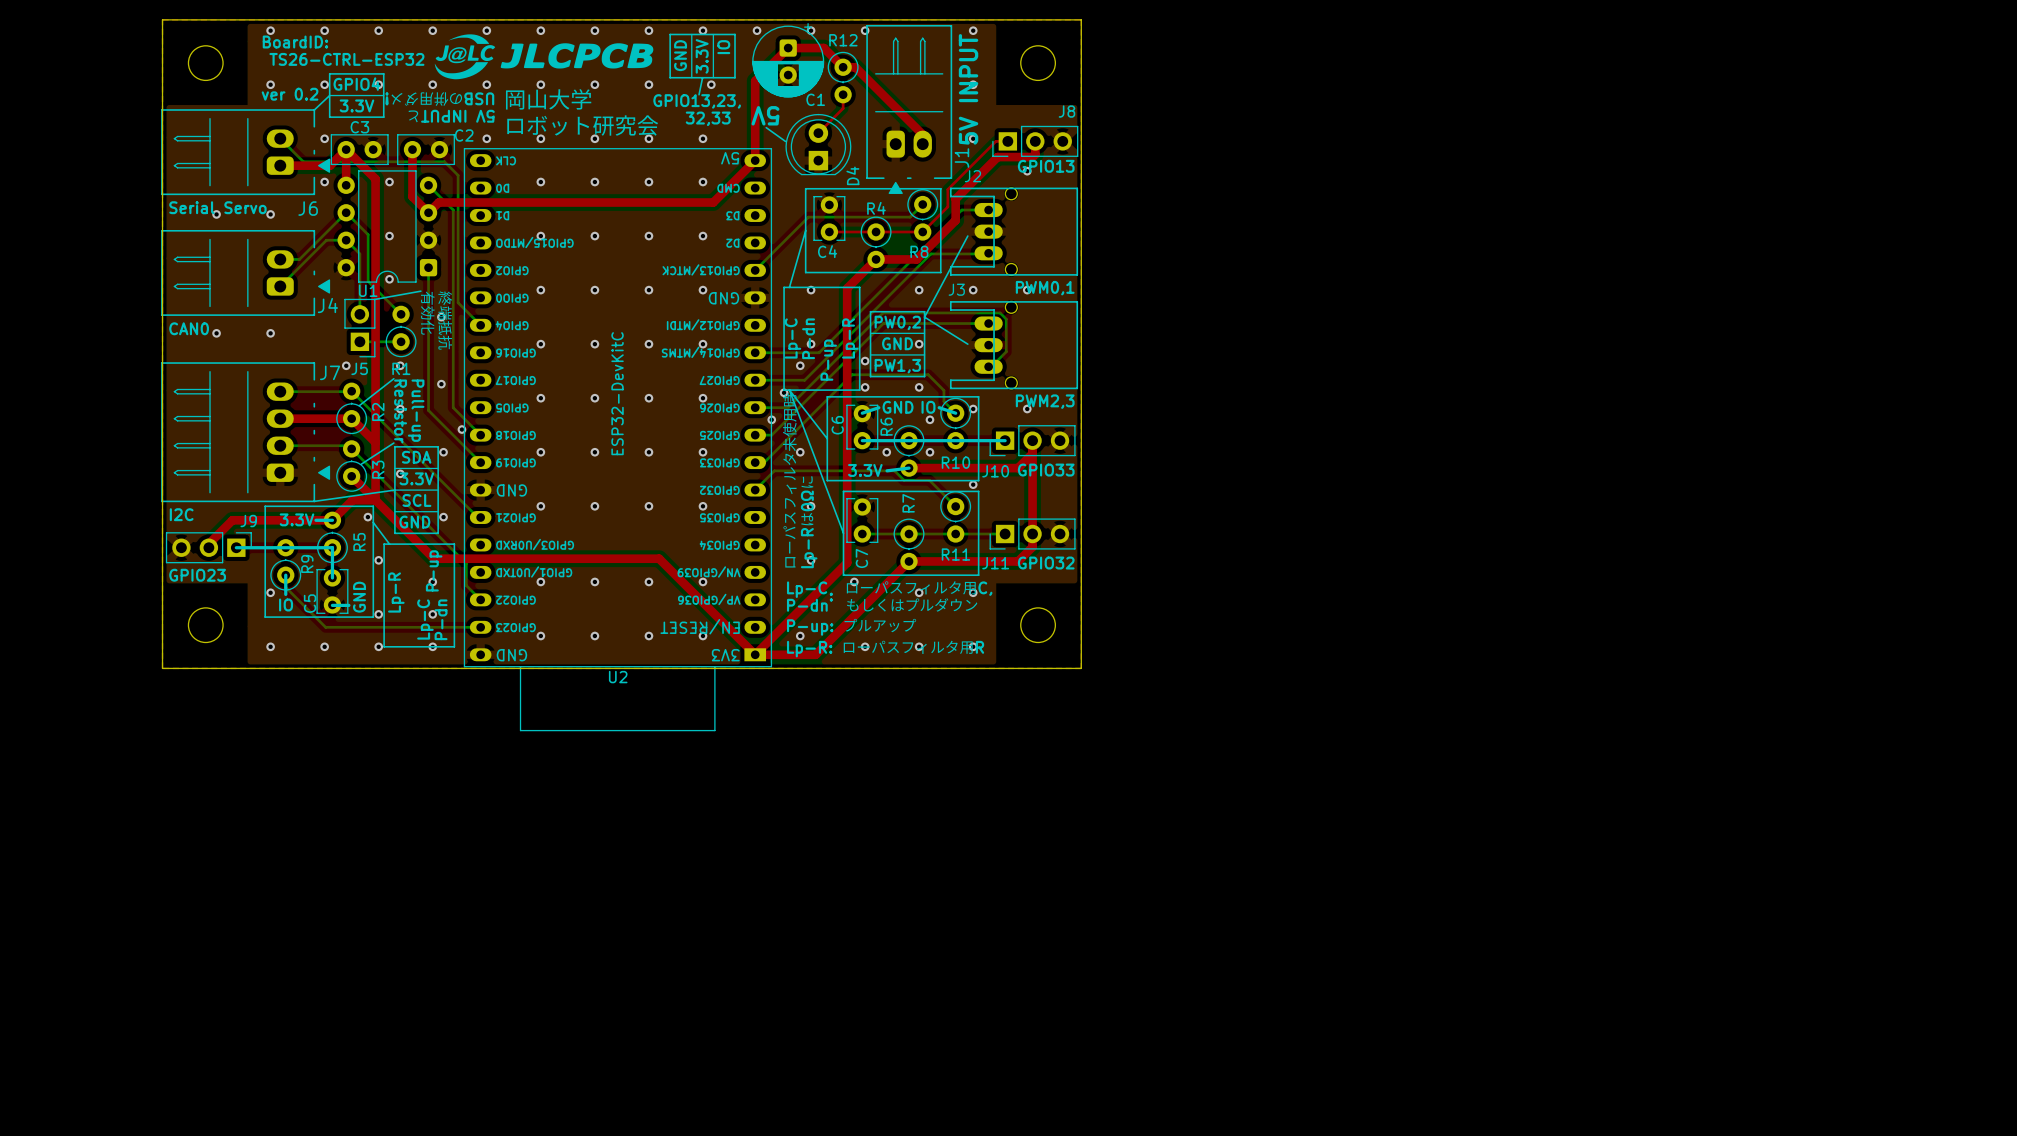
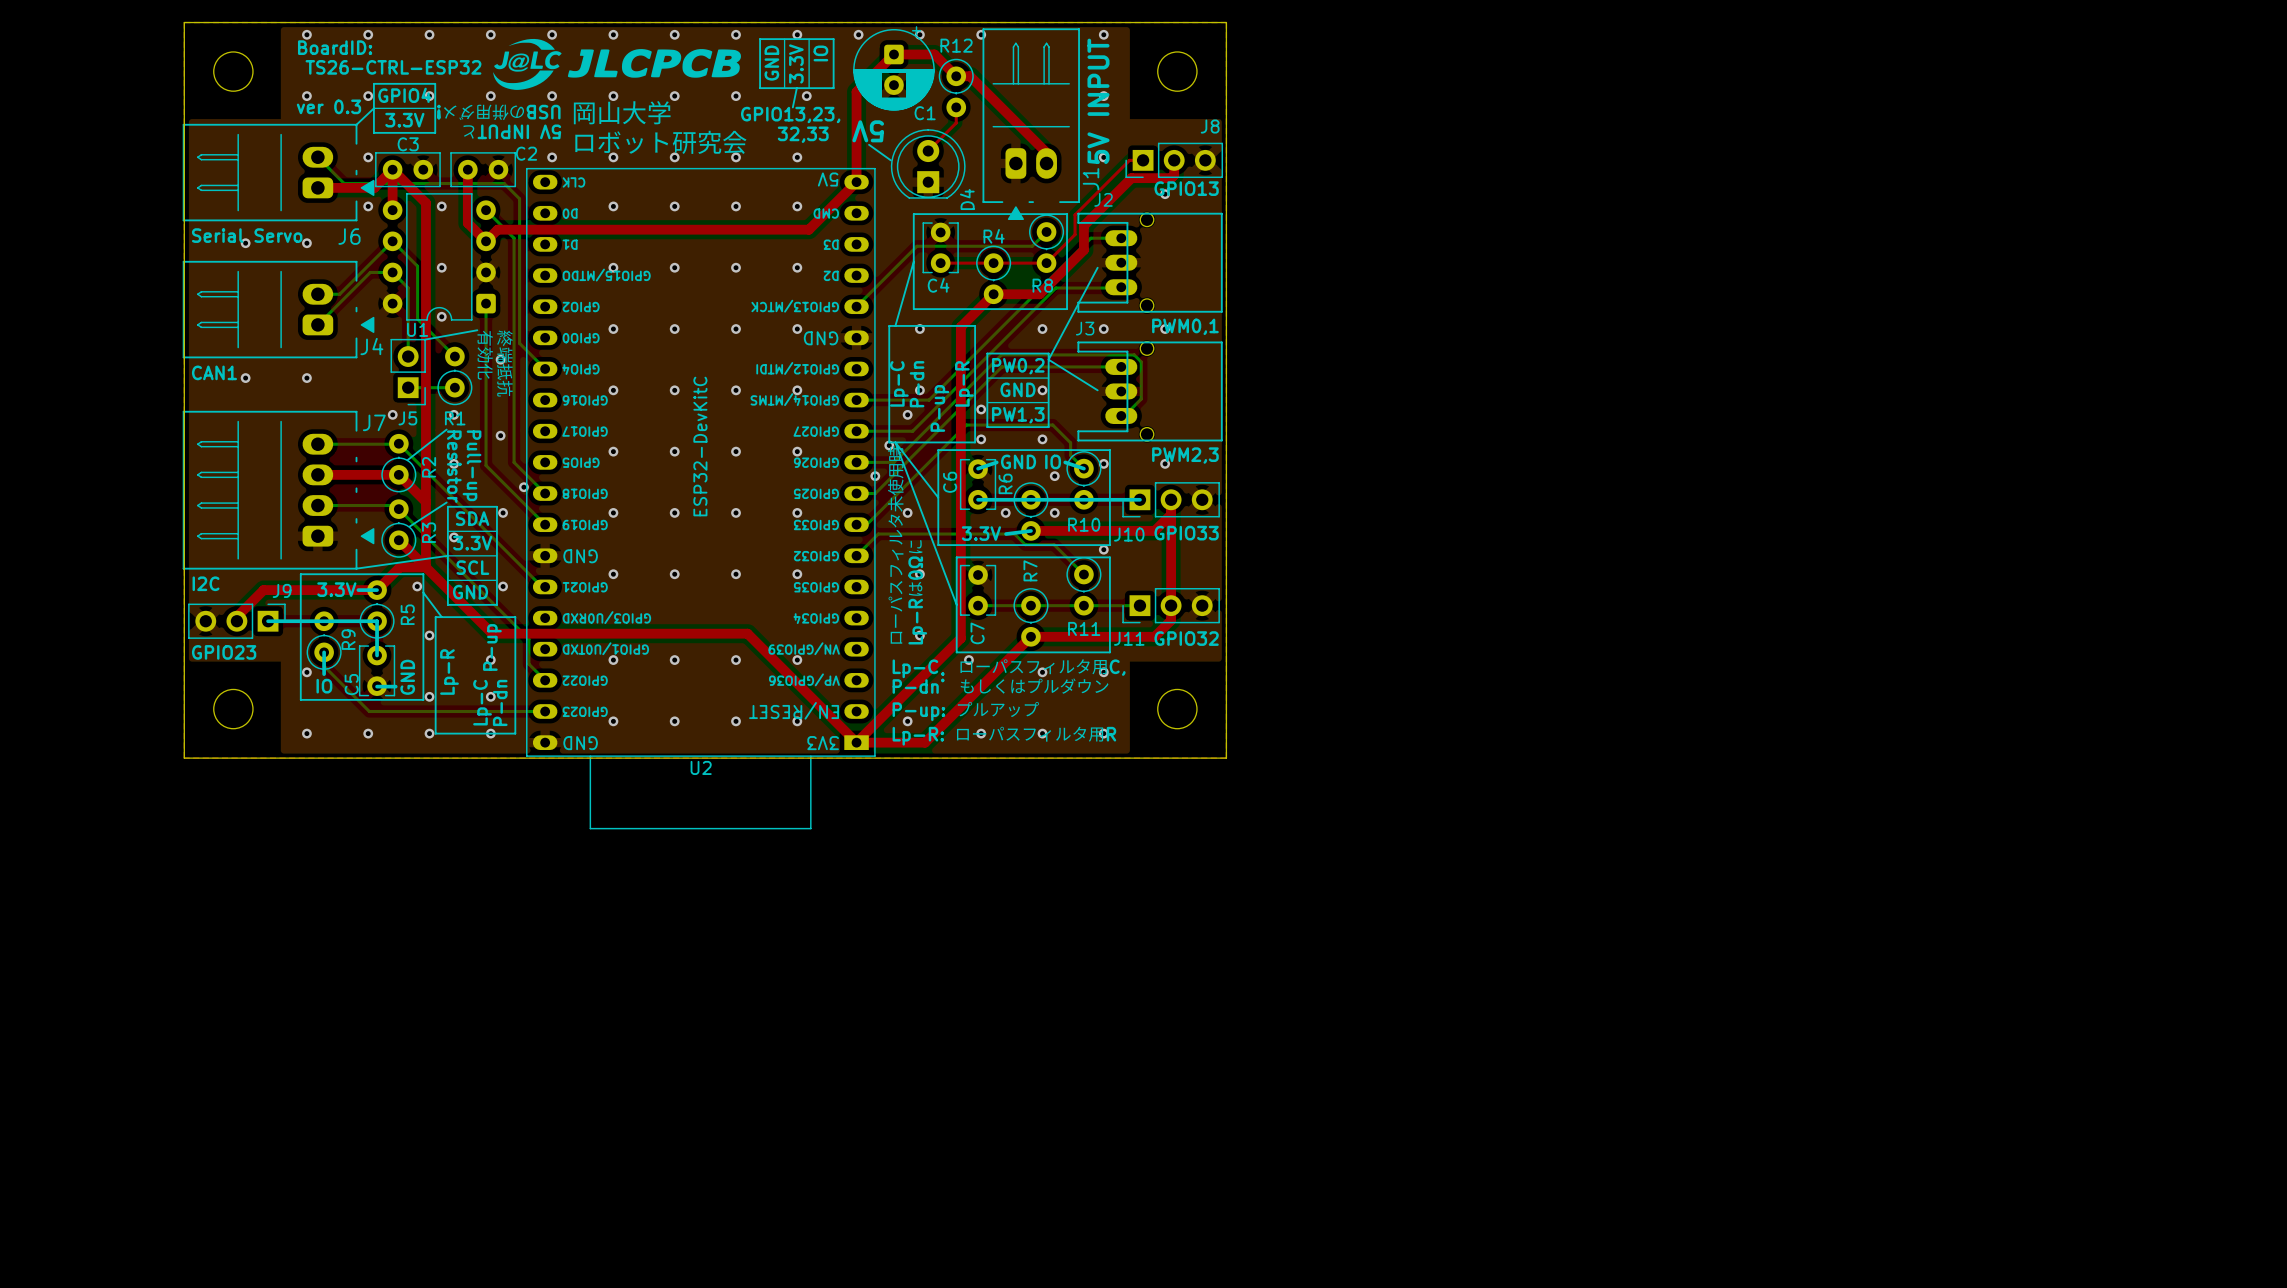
text: ver 0.2 (290, 94) -> ver 0.3 (328, 106)
text: CAN0 (189, 328) -> CAN1 (214, 372)

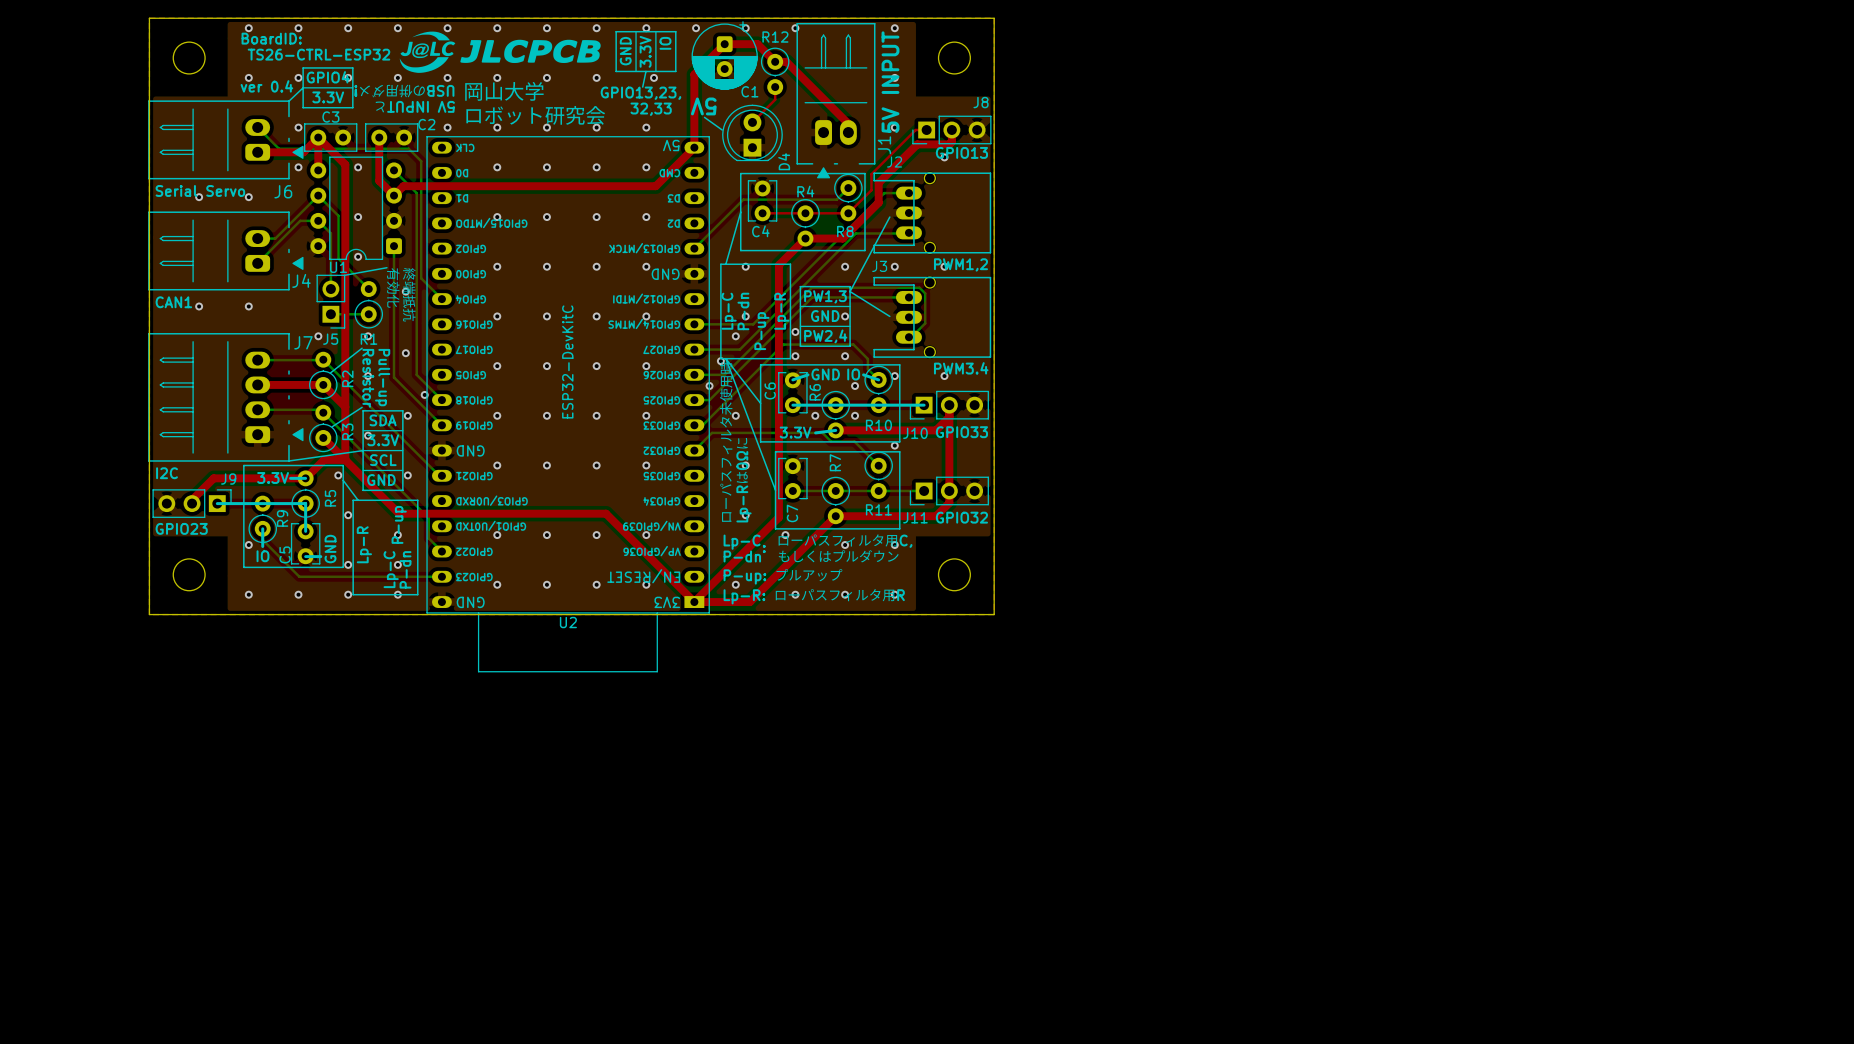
text: ver 0.3 (328, 106) -> ver 0.4 (266, 86)
text: PWM0,1 (1185, 326) -> PWM1,2 (960, 264)
text: PW0,2 (1018, 366) -> PW1,3 (825, 296)
text: PW1,3 (1018, 415) -> PW2,4 (825, 336)
text: PWM2,3 (1185, 455) -> PWM3.4 (961, 368)

